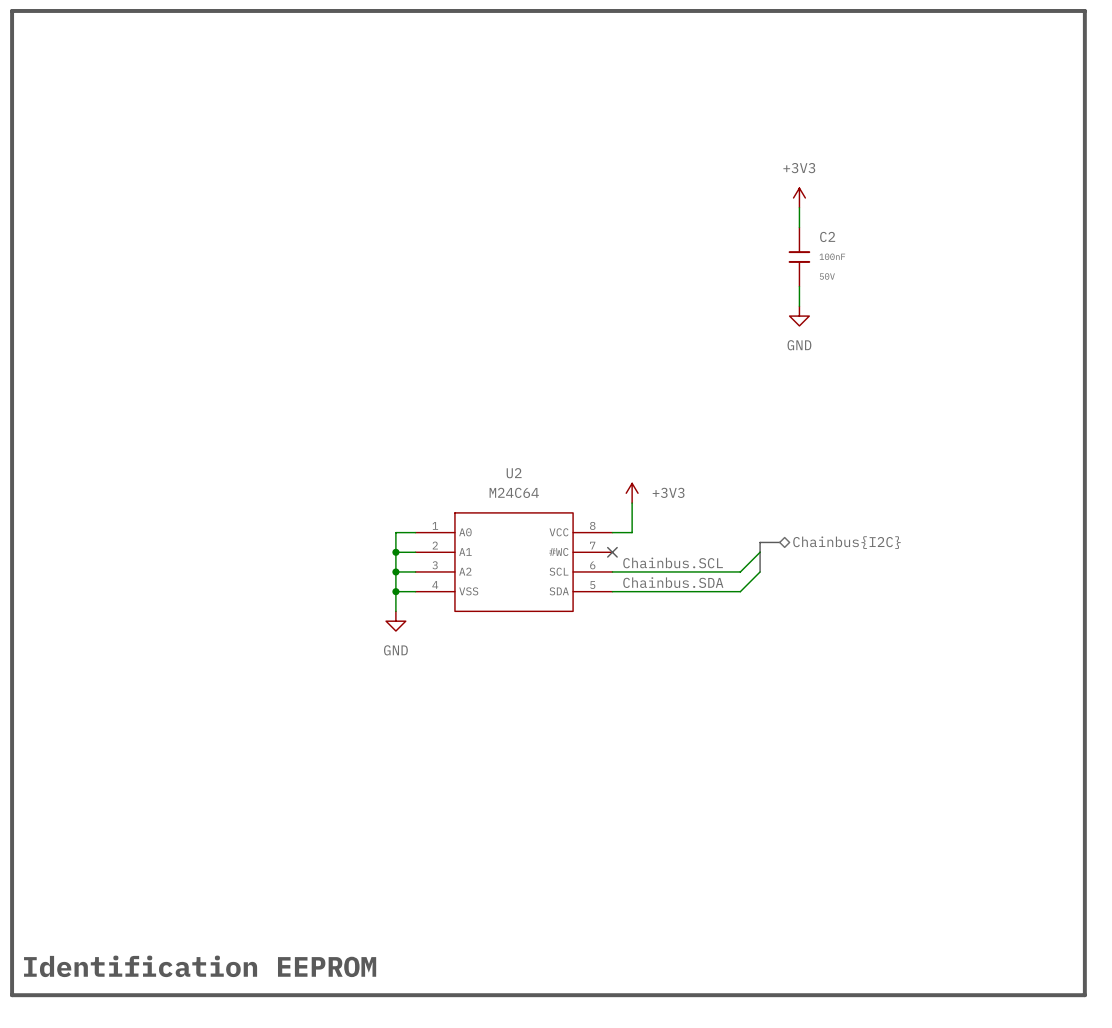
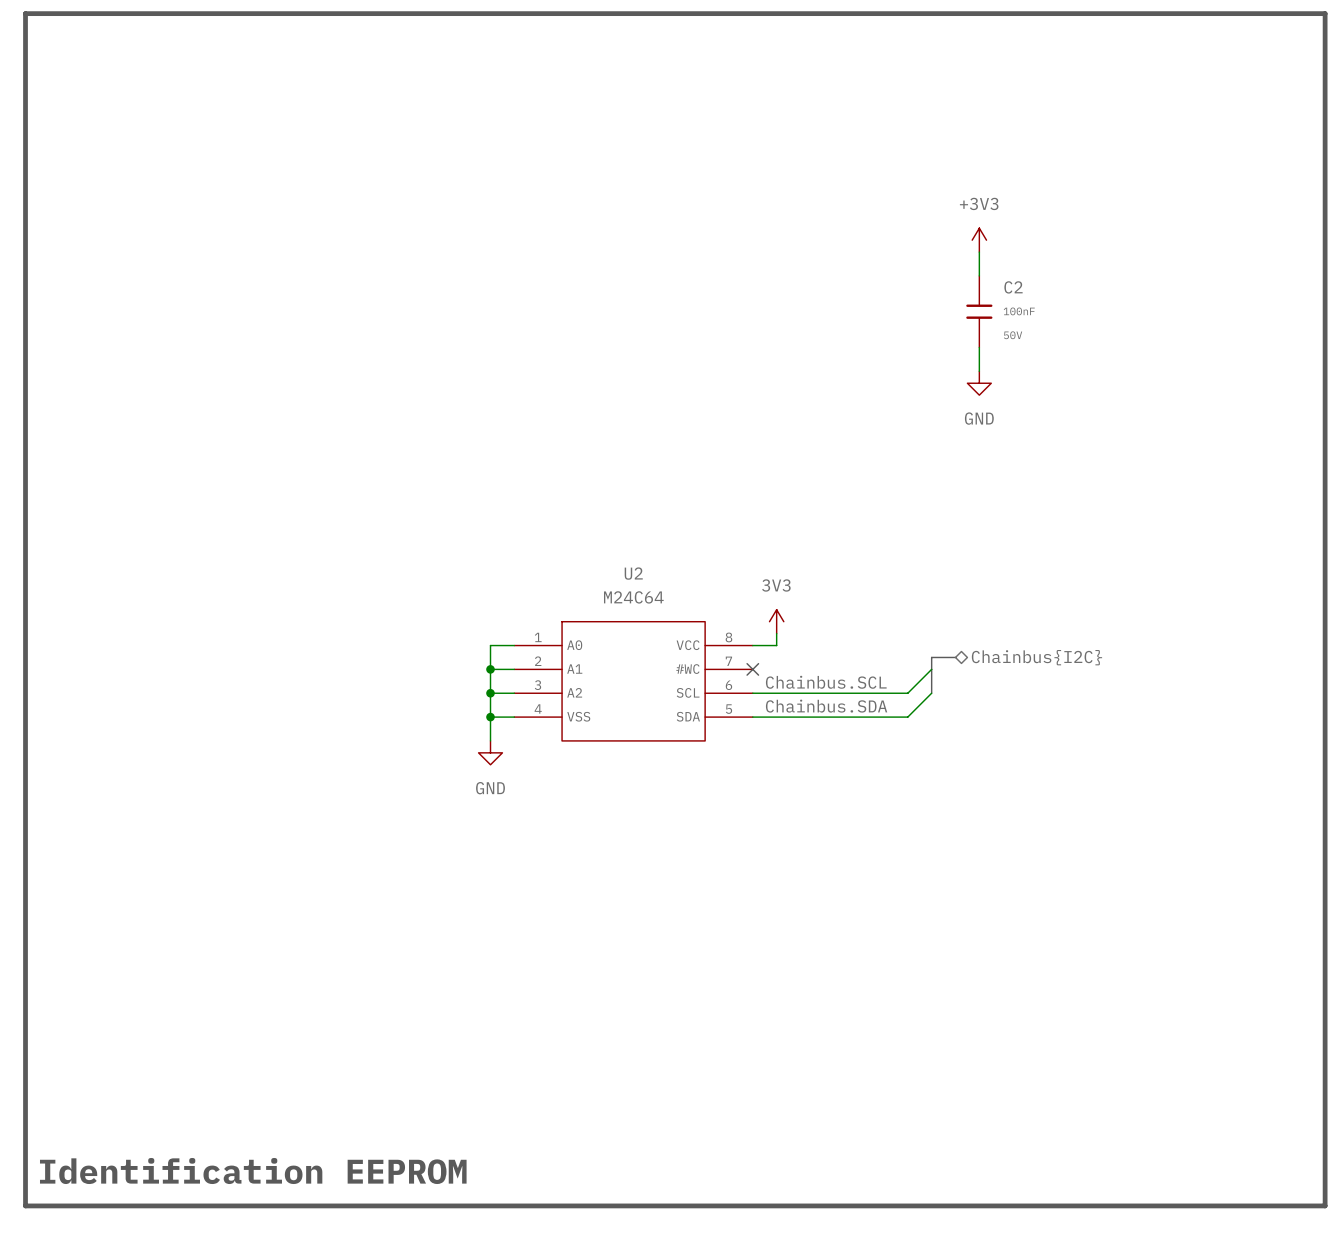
power symbol: +3V3 (632, 493) -> none
power symbol: none -> 3V3 (776, 621)

